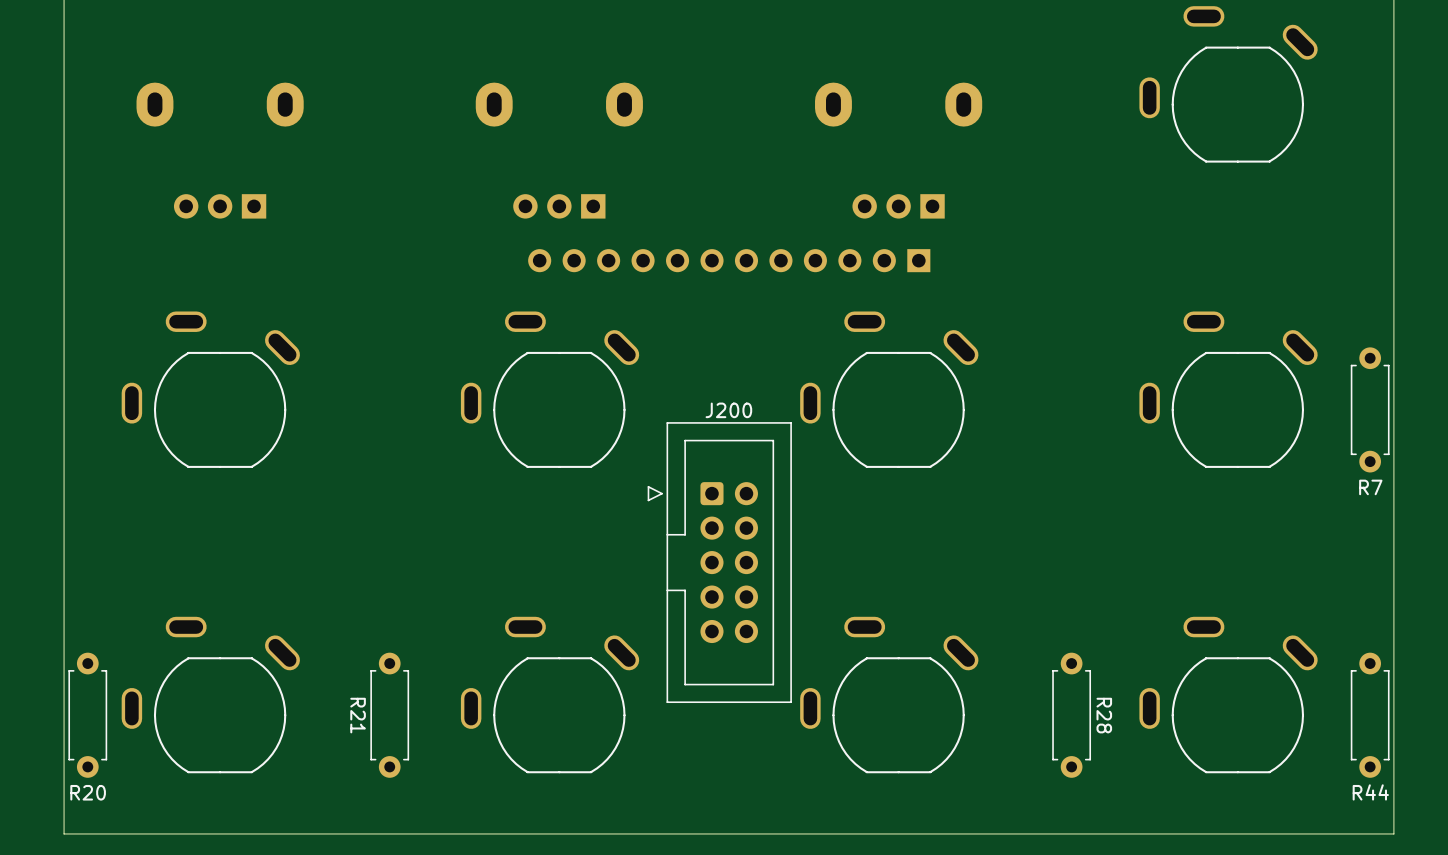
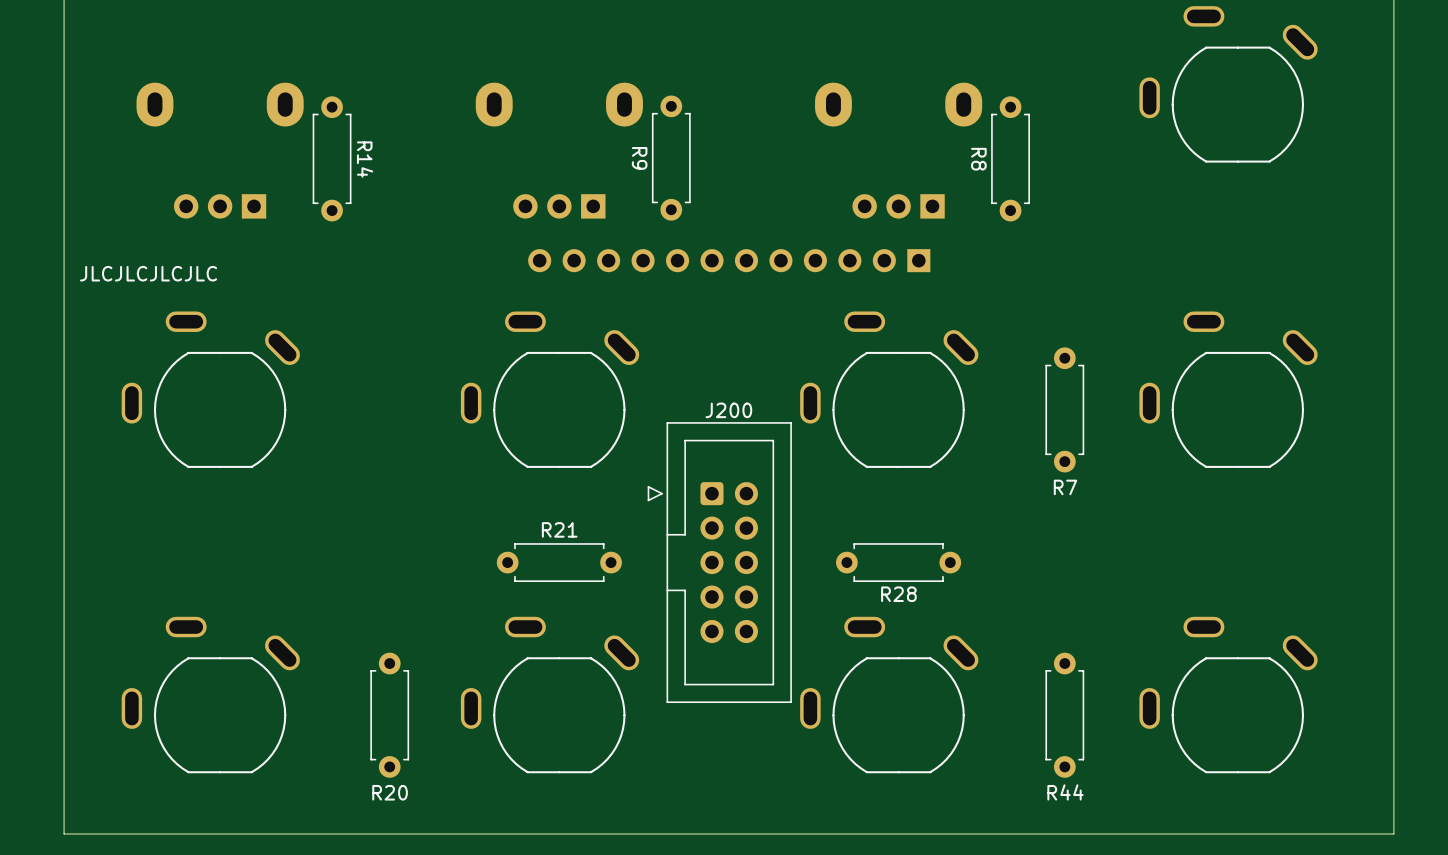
R14: none -> (332, 158)
R9: none -> (671, 158)
R8: none -> (1010, 158)
text: none -> JLCJLCJLCJLC (148, 273)
R7 position: (1370, 409) -> (1064, 409)
R21: none -> (559, 562)
R20: (87, 715) -> none
R21 name: R21 (358, 715) -> R20 (390, 792)
R28 rotation: 0° (1071, 715) -> 90° clockwise (898, 562)
R28 position: (1071, 715) -> (898, 562)
R44 position: (1370, 715) -> (1064, 715)

